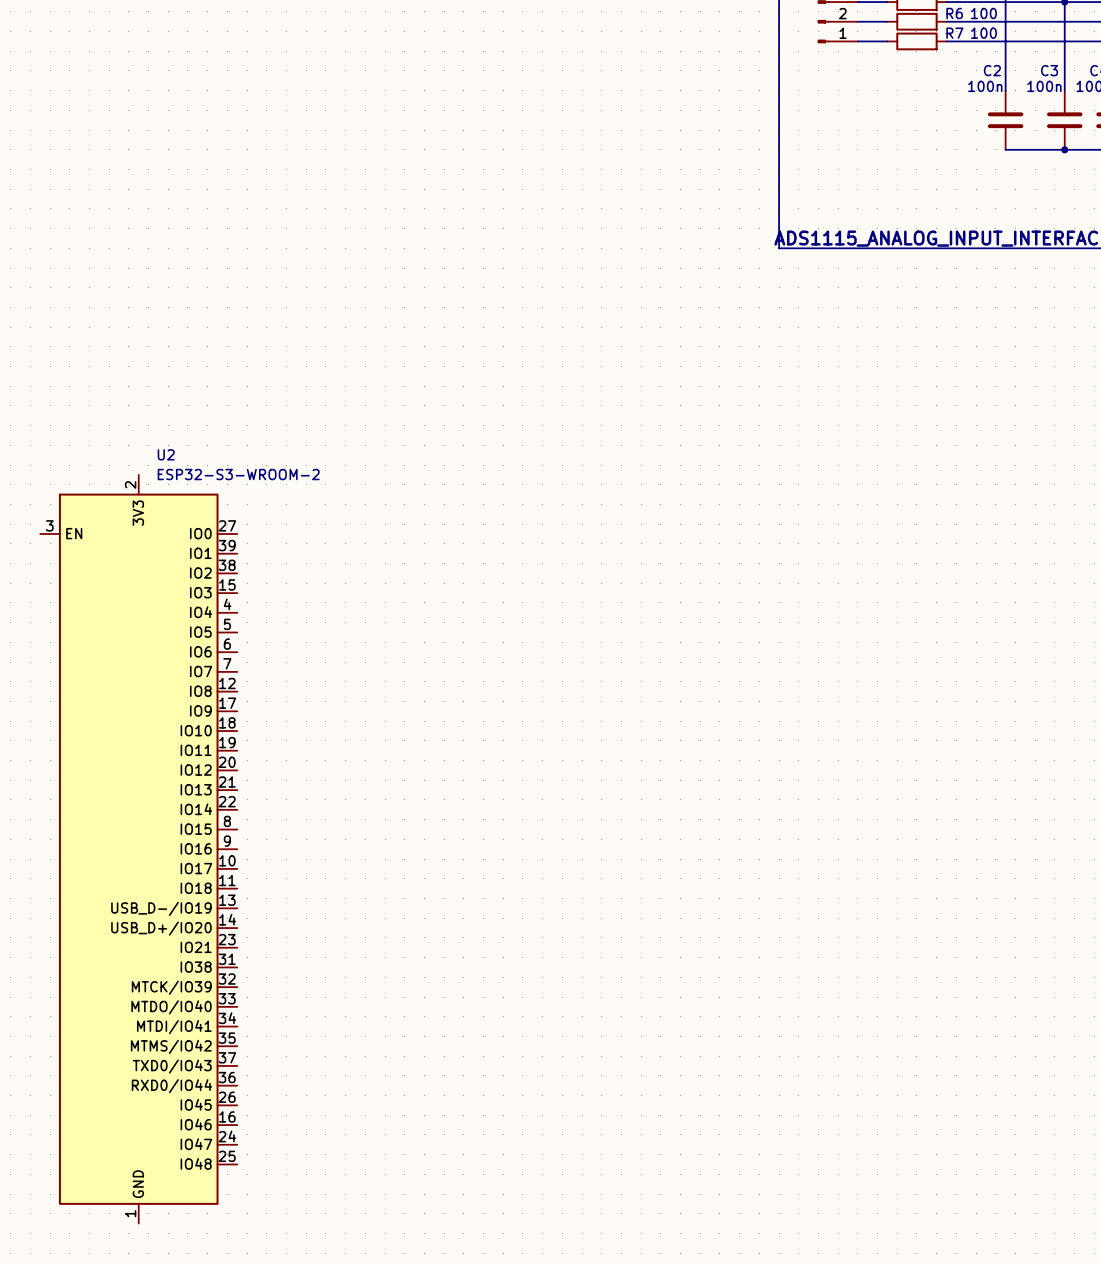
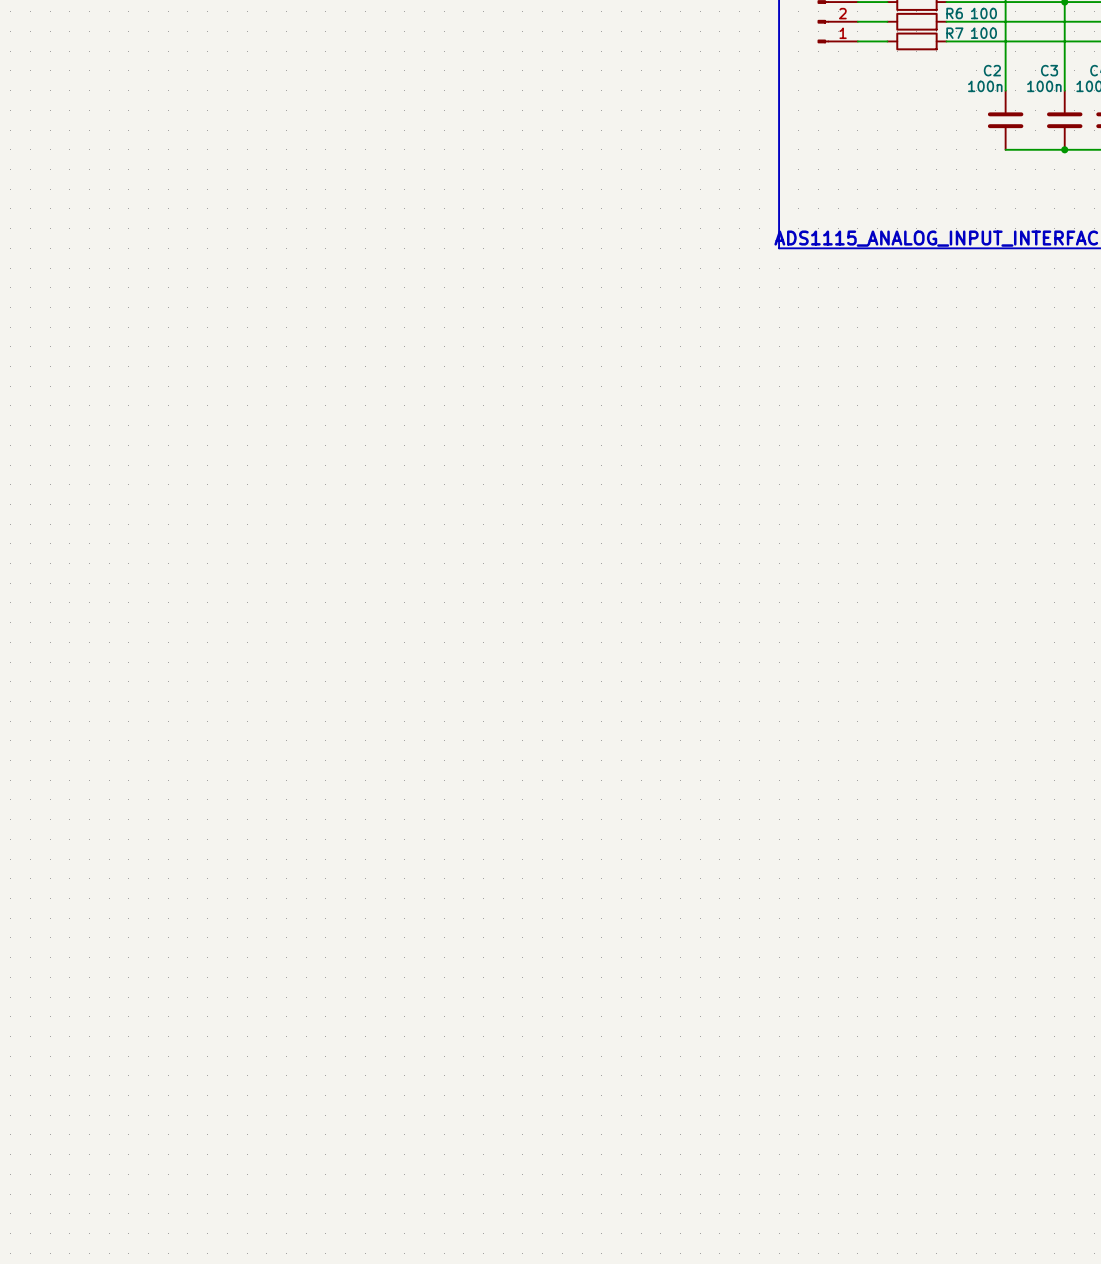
U2: ESP32-S3-WROOM-2 (138, 849) -> none

